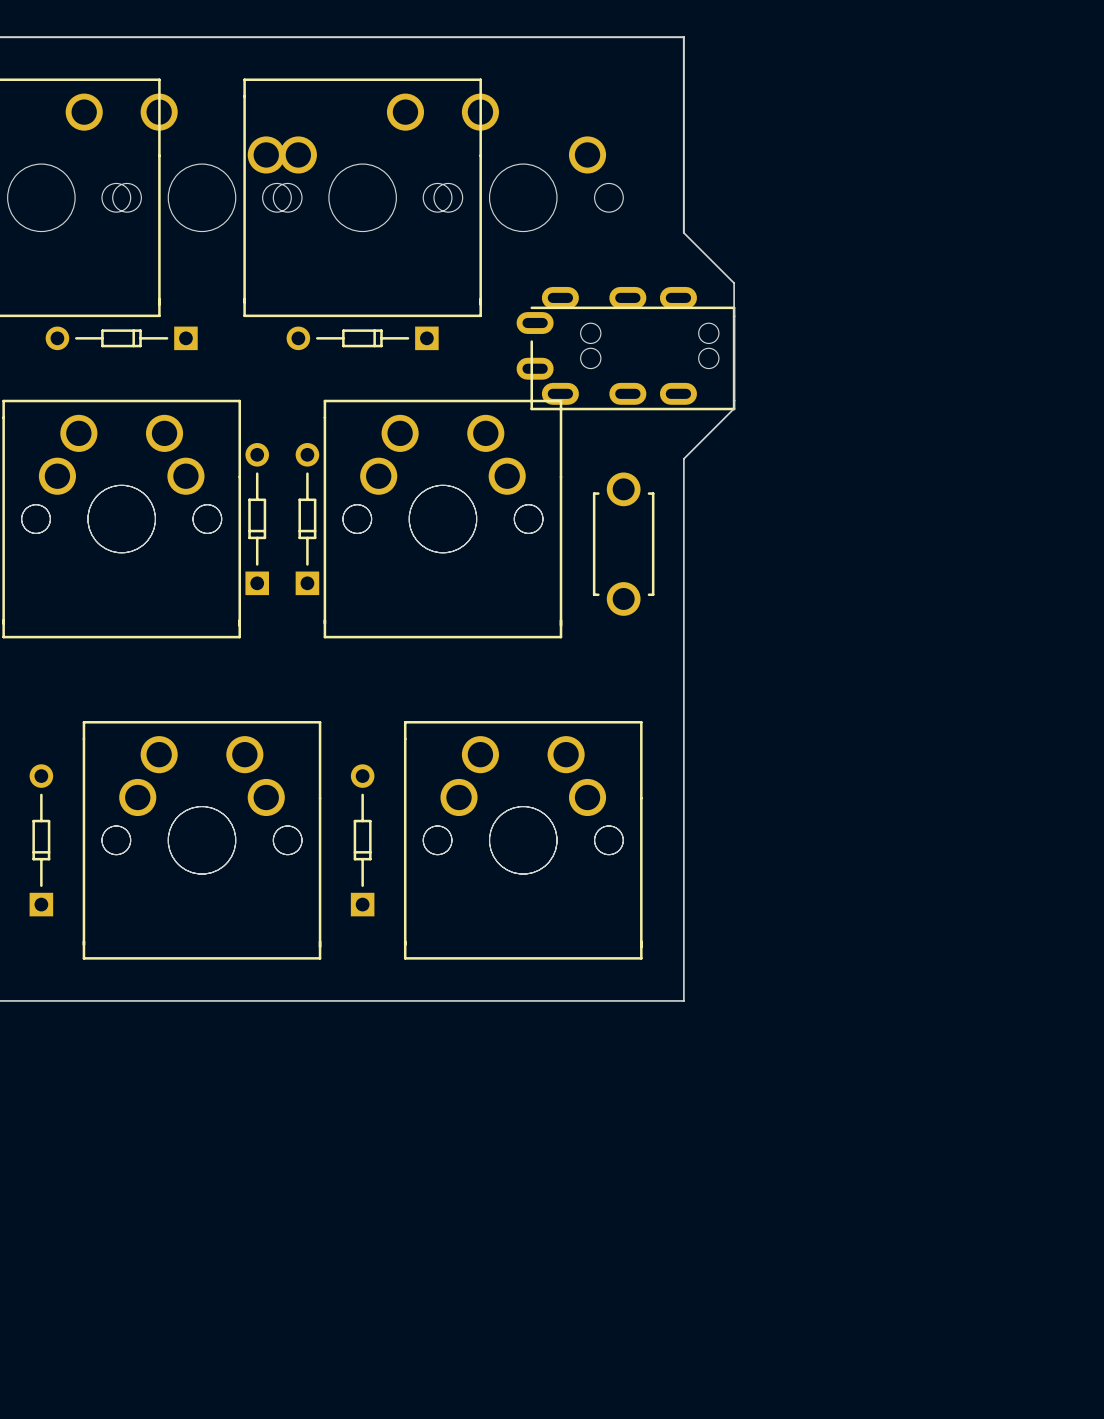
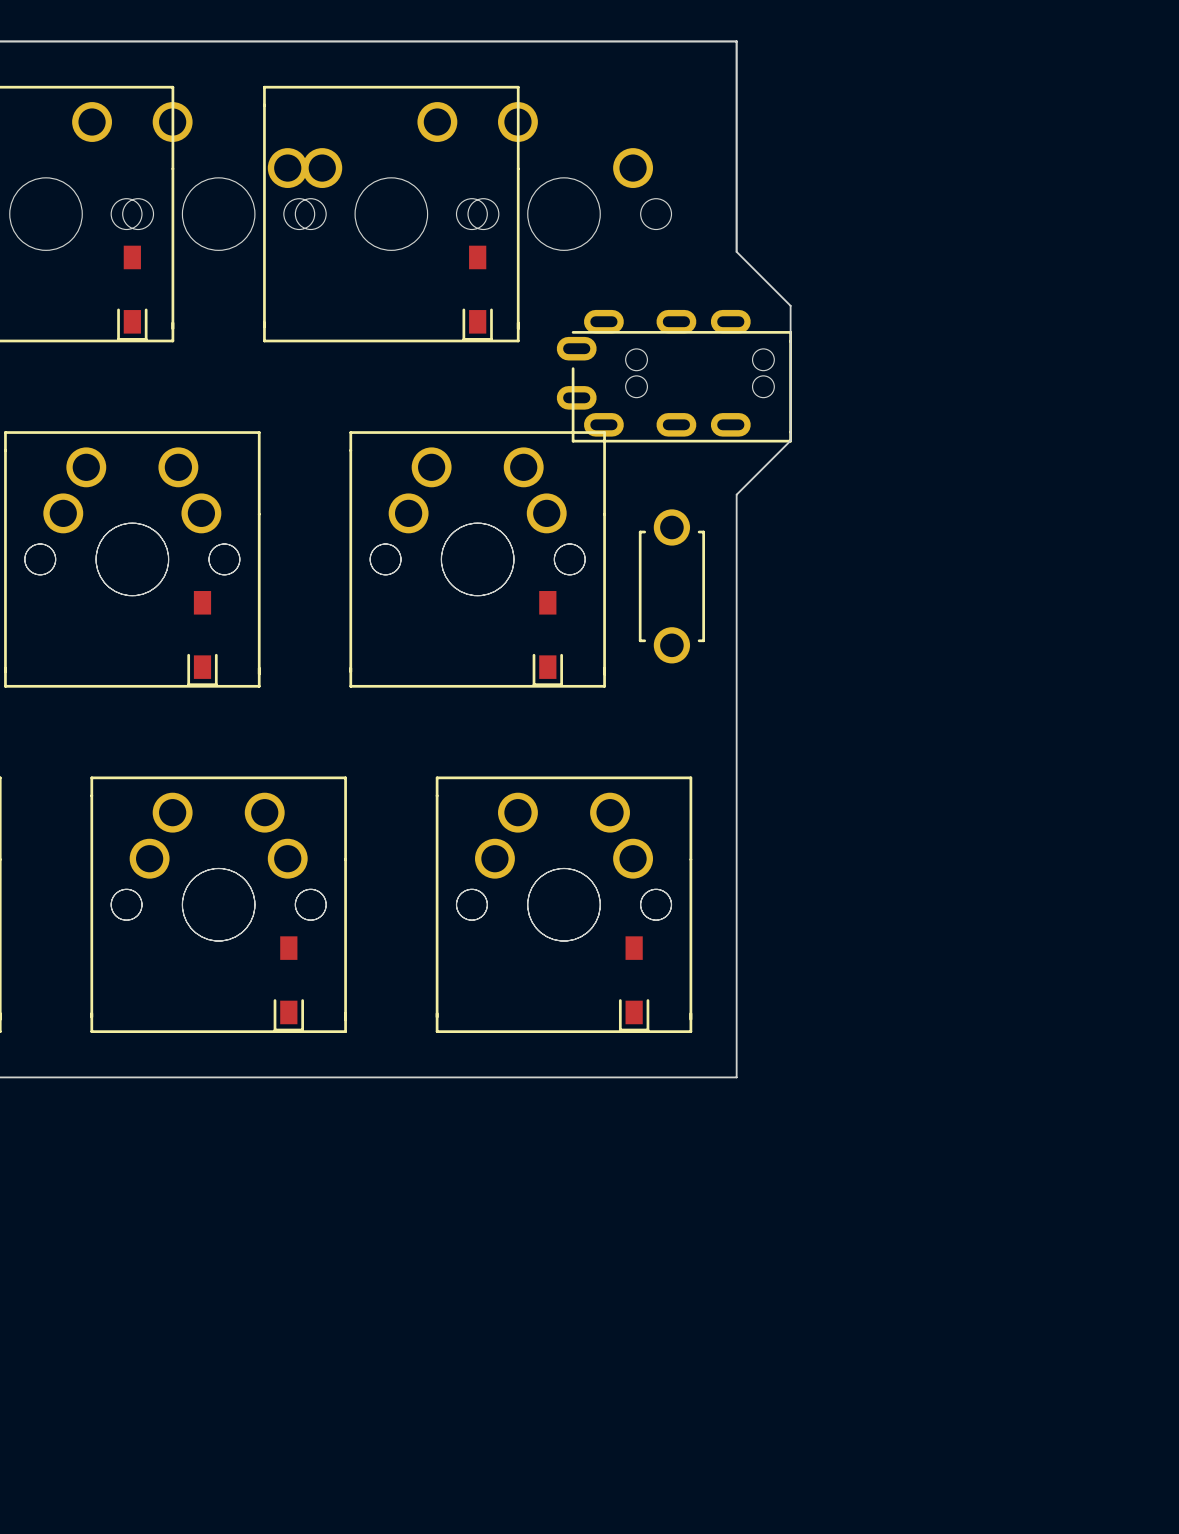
part: none -> (132, 293)
part: none -> (477, 293)
part: (121, 338) -> none
part: (362, 338) -> none
part: (257, 519) -> none
part: (307, 519) -> none
part: none -> (202, 638)
part: none -> (547, 638)
part: (41, 840) -> none
part: (362, 840) -> none
part: none -> (288, 983)
part: none -> (634, 983)

